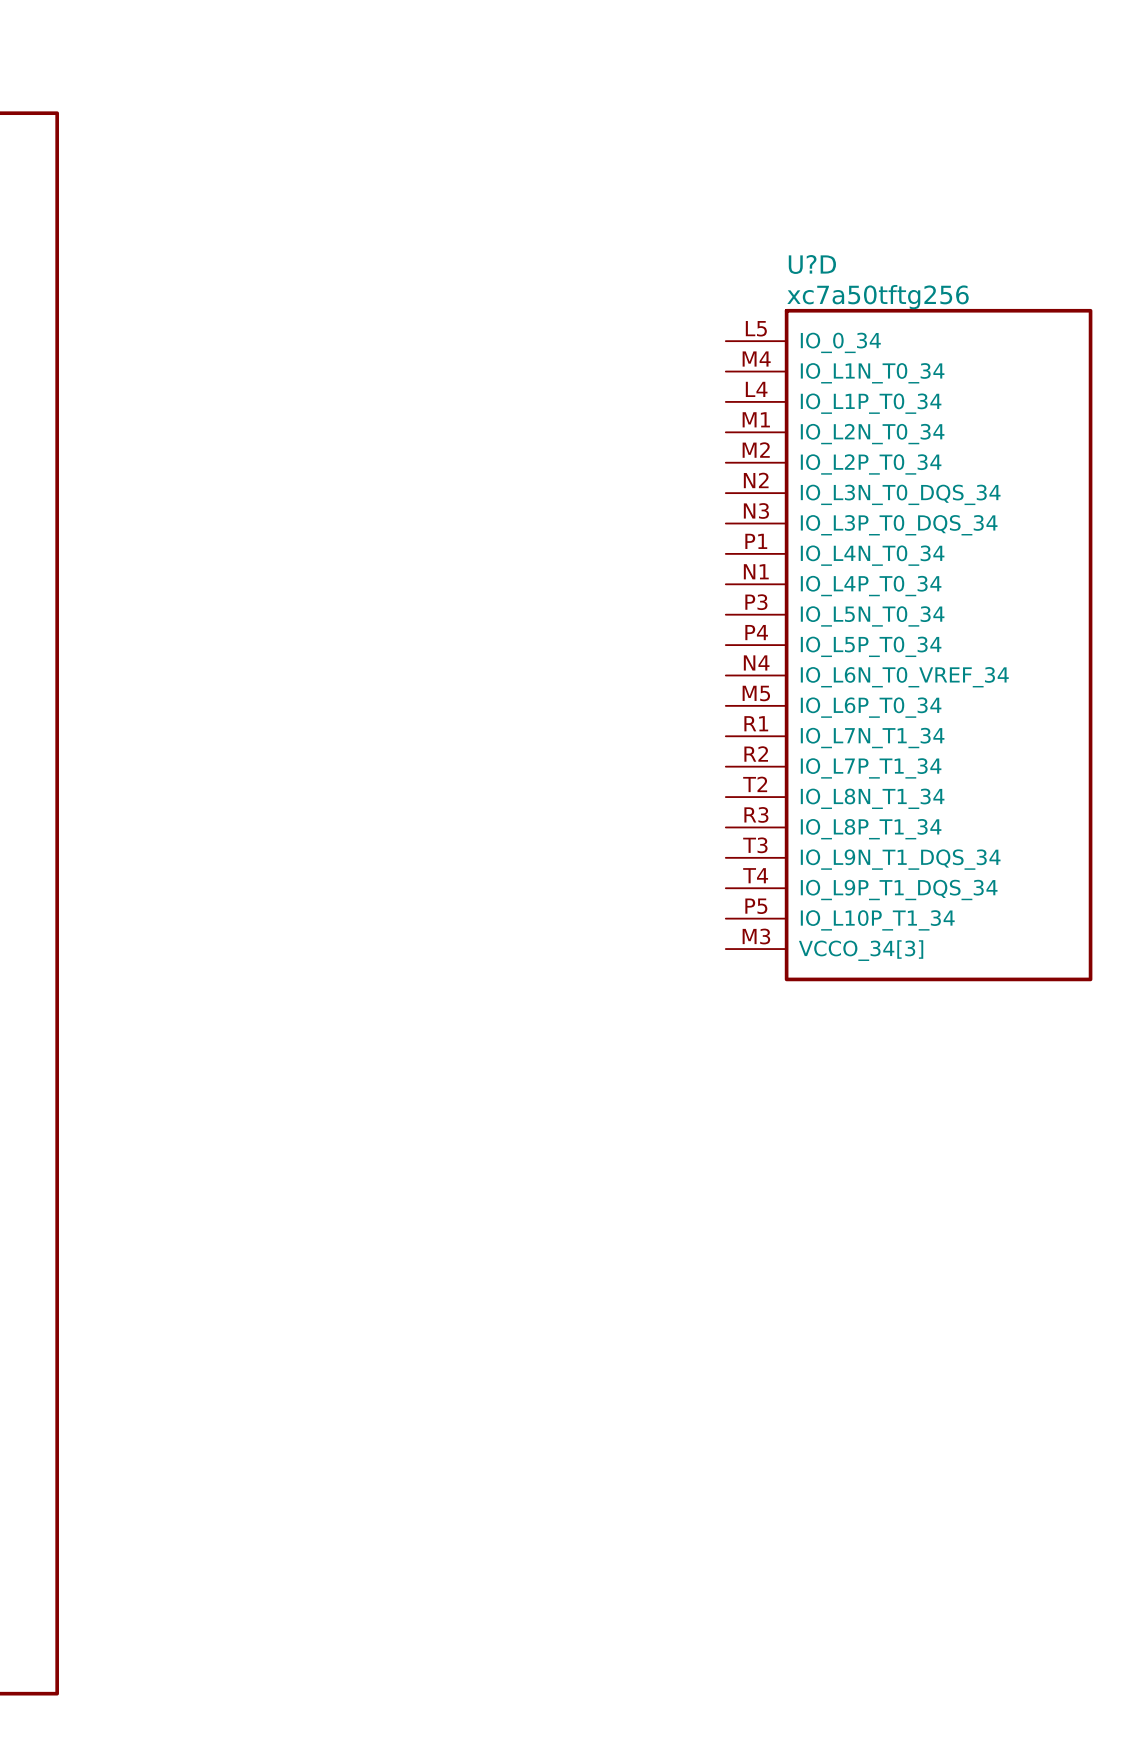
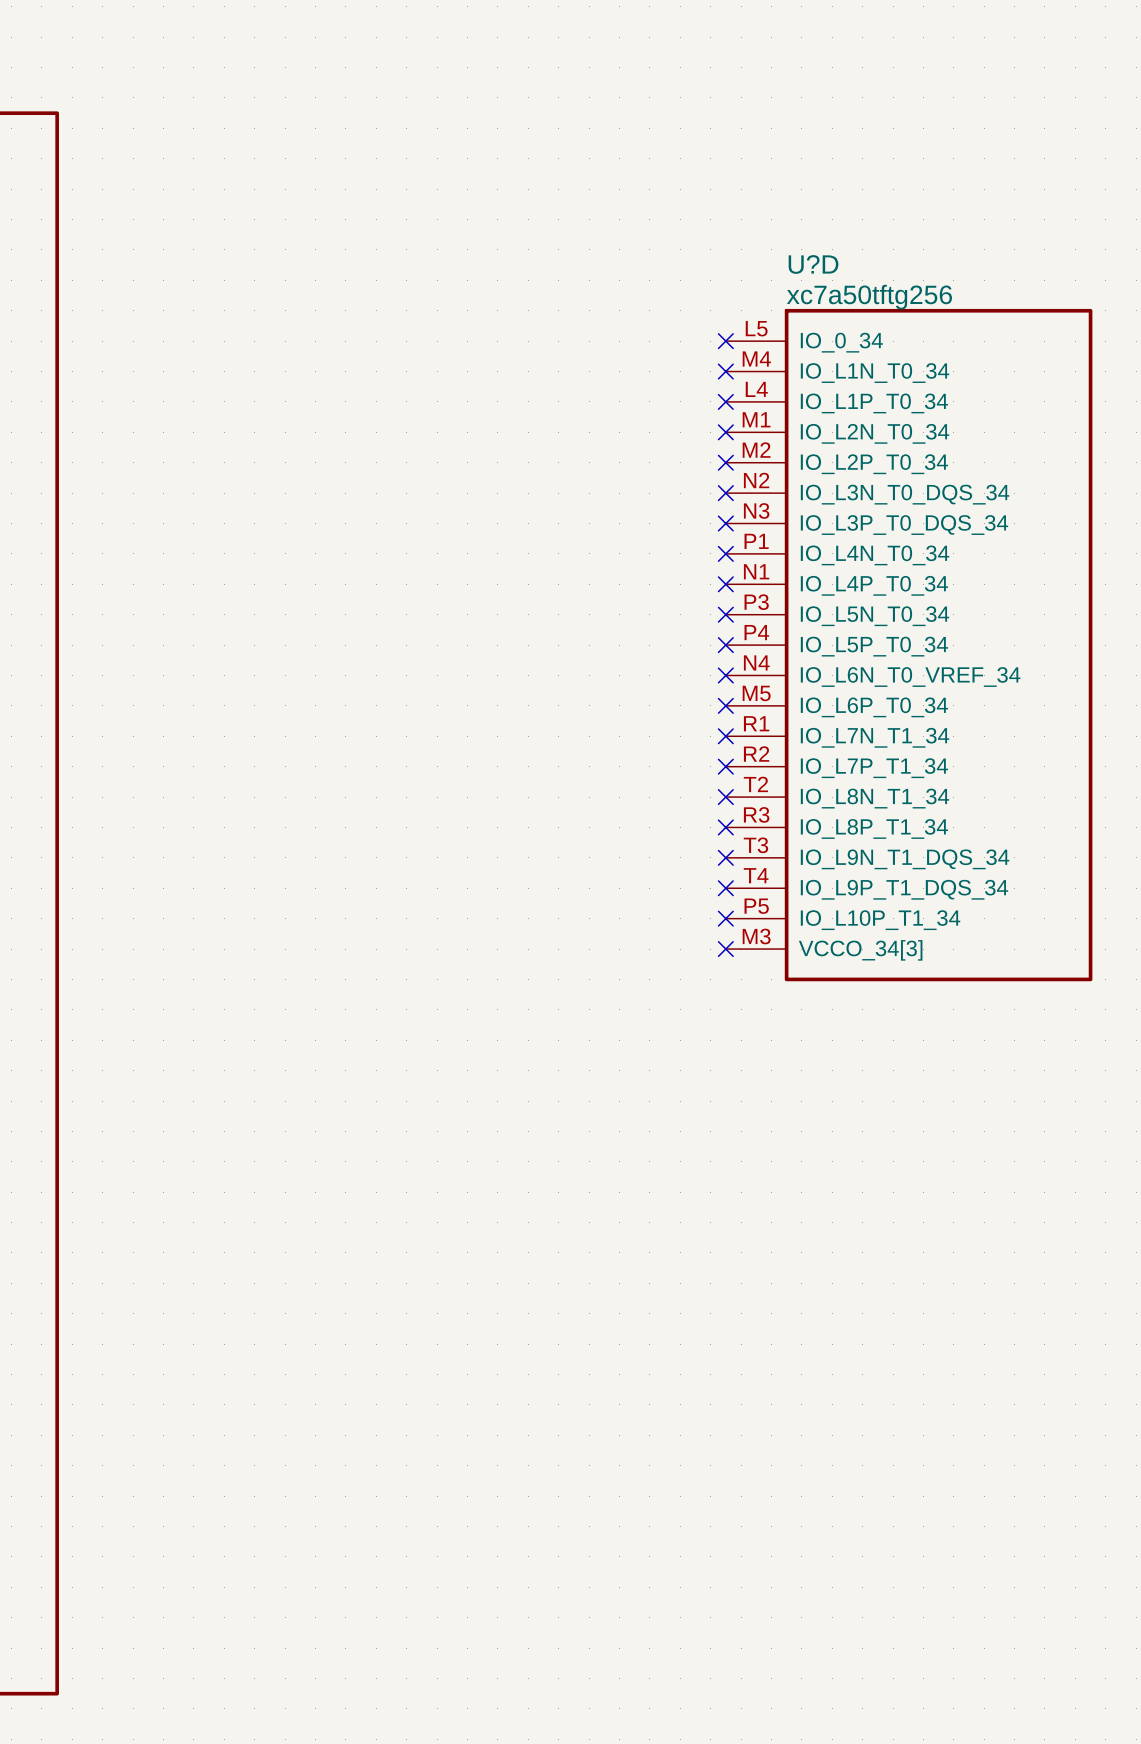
no-connect mark: none -> (725, 341)
no-connect mark: none -> (725, 371)
no-connect mark: none -> (725, 401)
no-connect mark: none -> (725, 432)
no-connect mark: none -> (725, 462)
no-connect mark: none -> (725, 493)
no-connect mark: none -> (725, 523)
no-connect mark: none -> (725, 553)
no-connect mark: none -> (725, 584)
no-connect mark: none -> (725, 614)
no-connect mark: none -> (725, 645)
no-connect mark: none -> (725, 675)
no-connect mark: none -> (725, 705)
no-connect mark: none -> (725, 736)
no-connect mark: none -> (725, 766)
no-connect mark: none -> (725, 797)
no-connect mark: none -> (725, 827)
no-connect mark: none -> (725, 857)
no-connect mark: none -> (725, 888)
no-connect mark: none -> (725, 918)
no-connect mark: none -> (725, 949)

